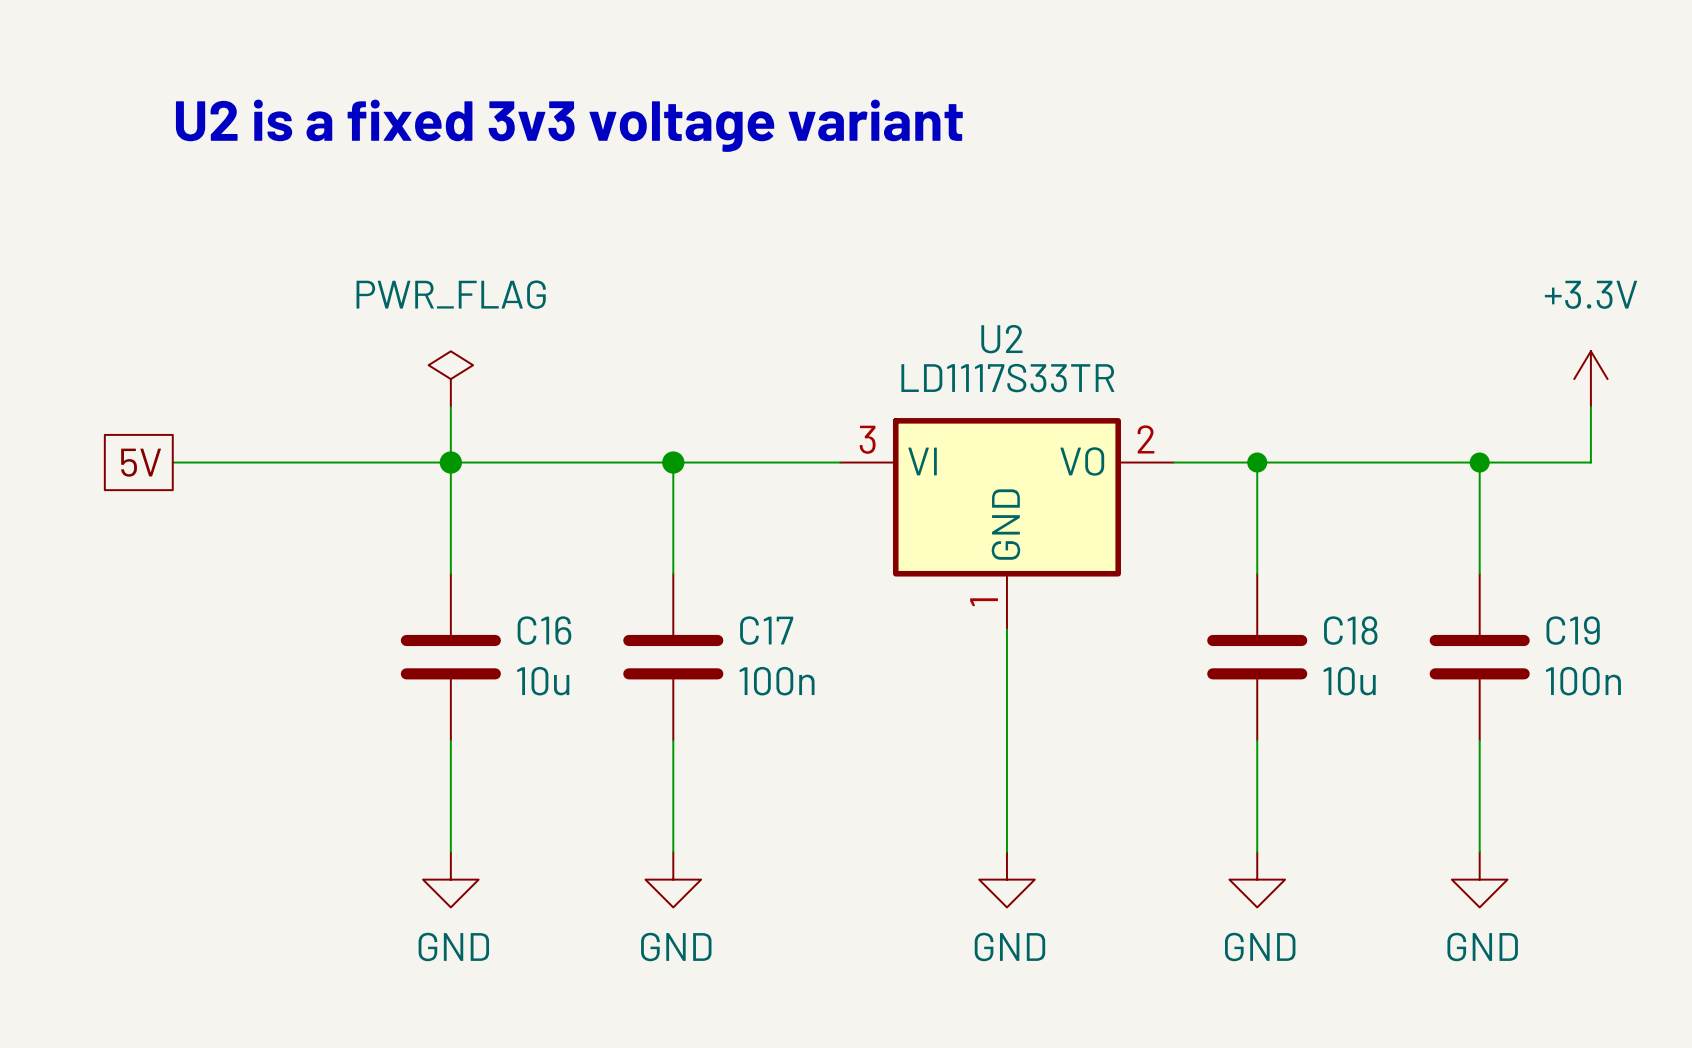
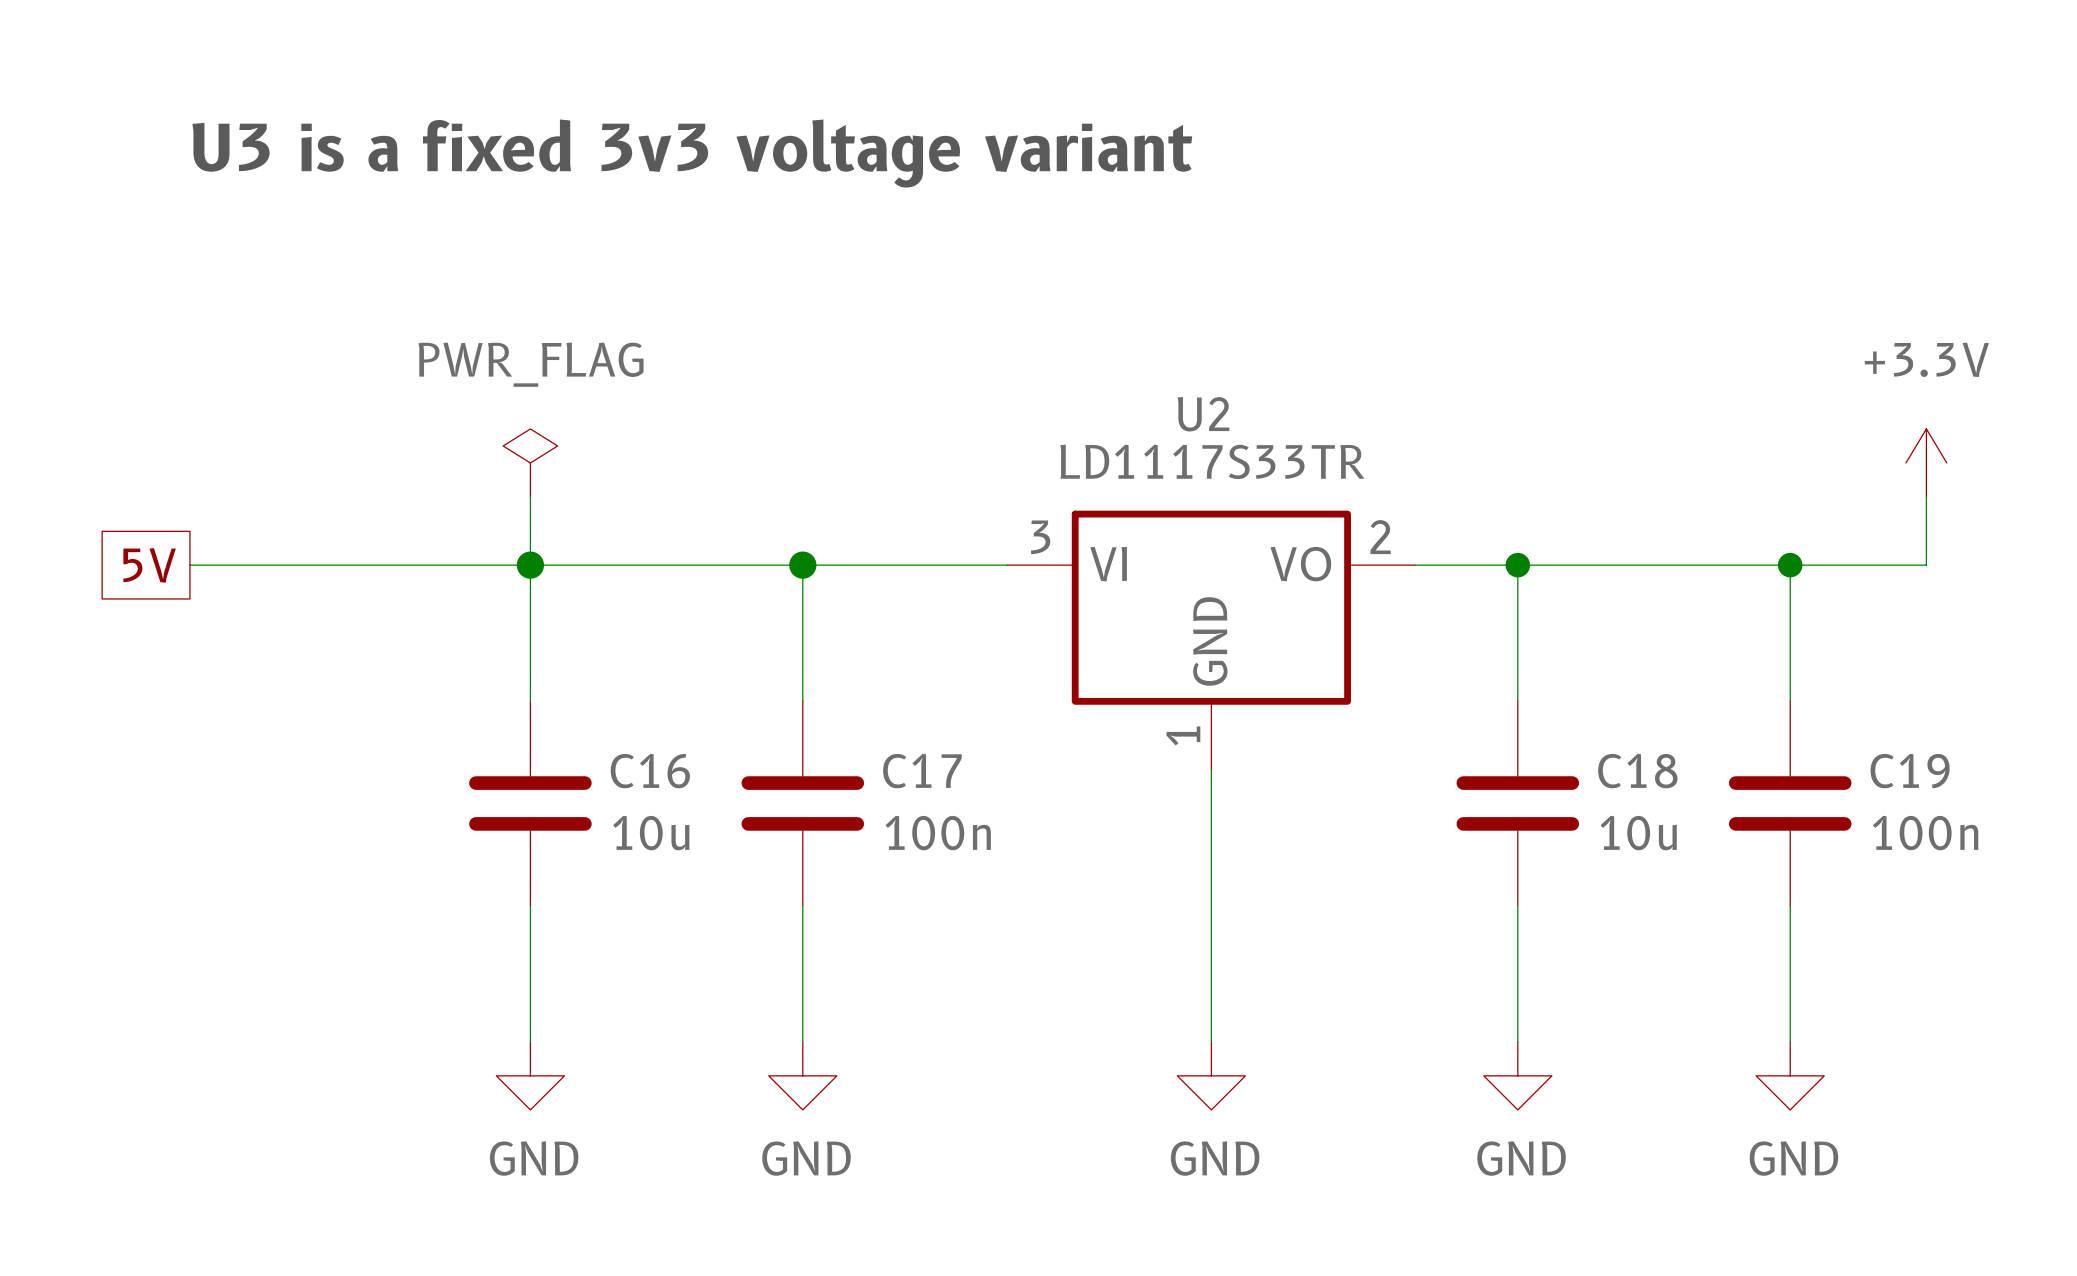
text: U2 is a fixed 3v3 voltage variant (569, 125) -> U3 is a fixed 3v3 voltage variant (692, 153)

